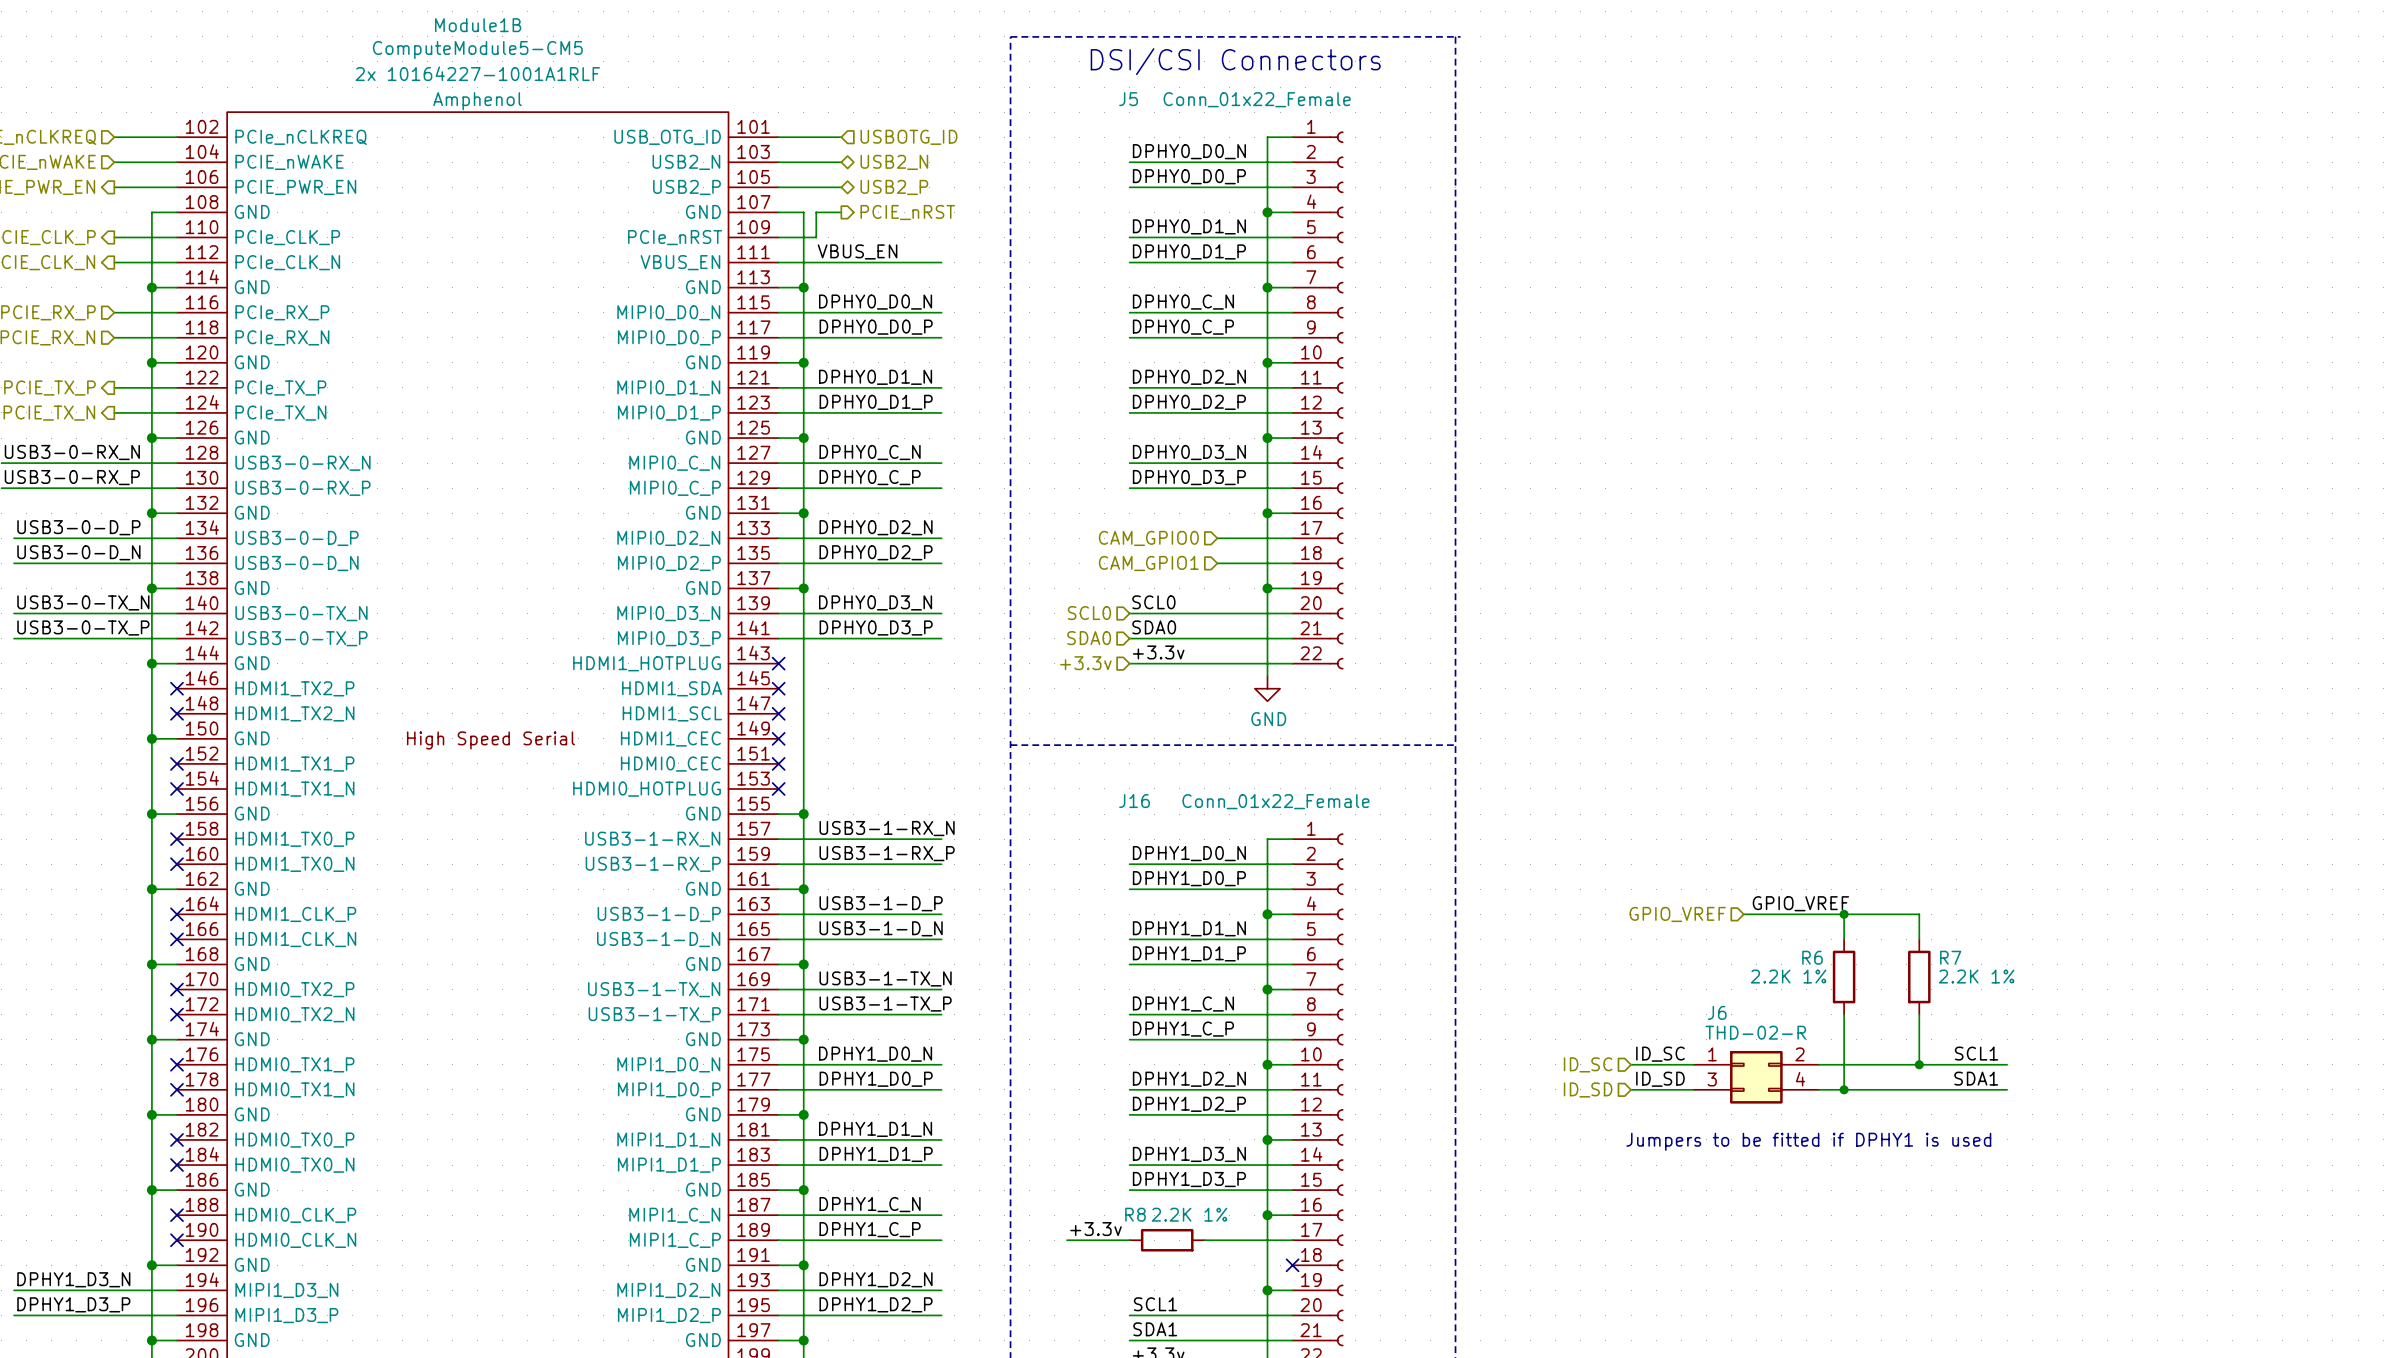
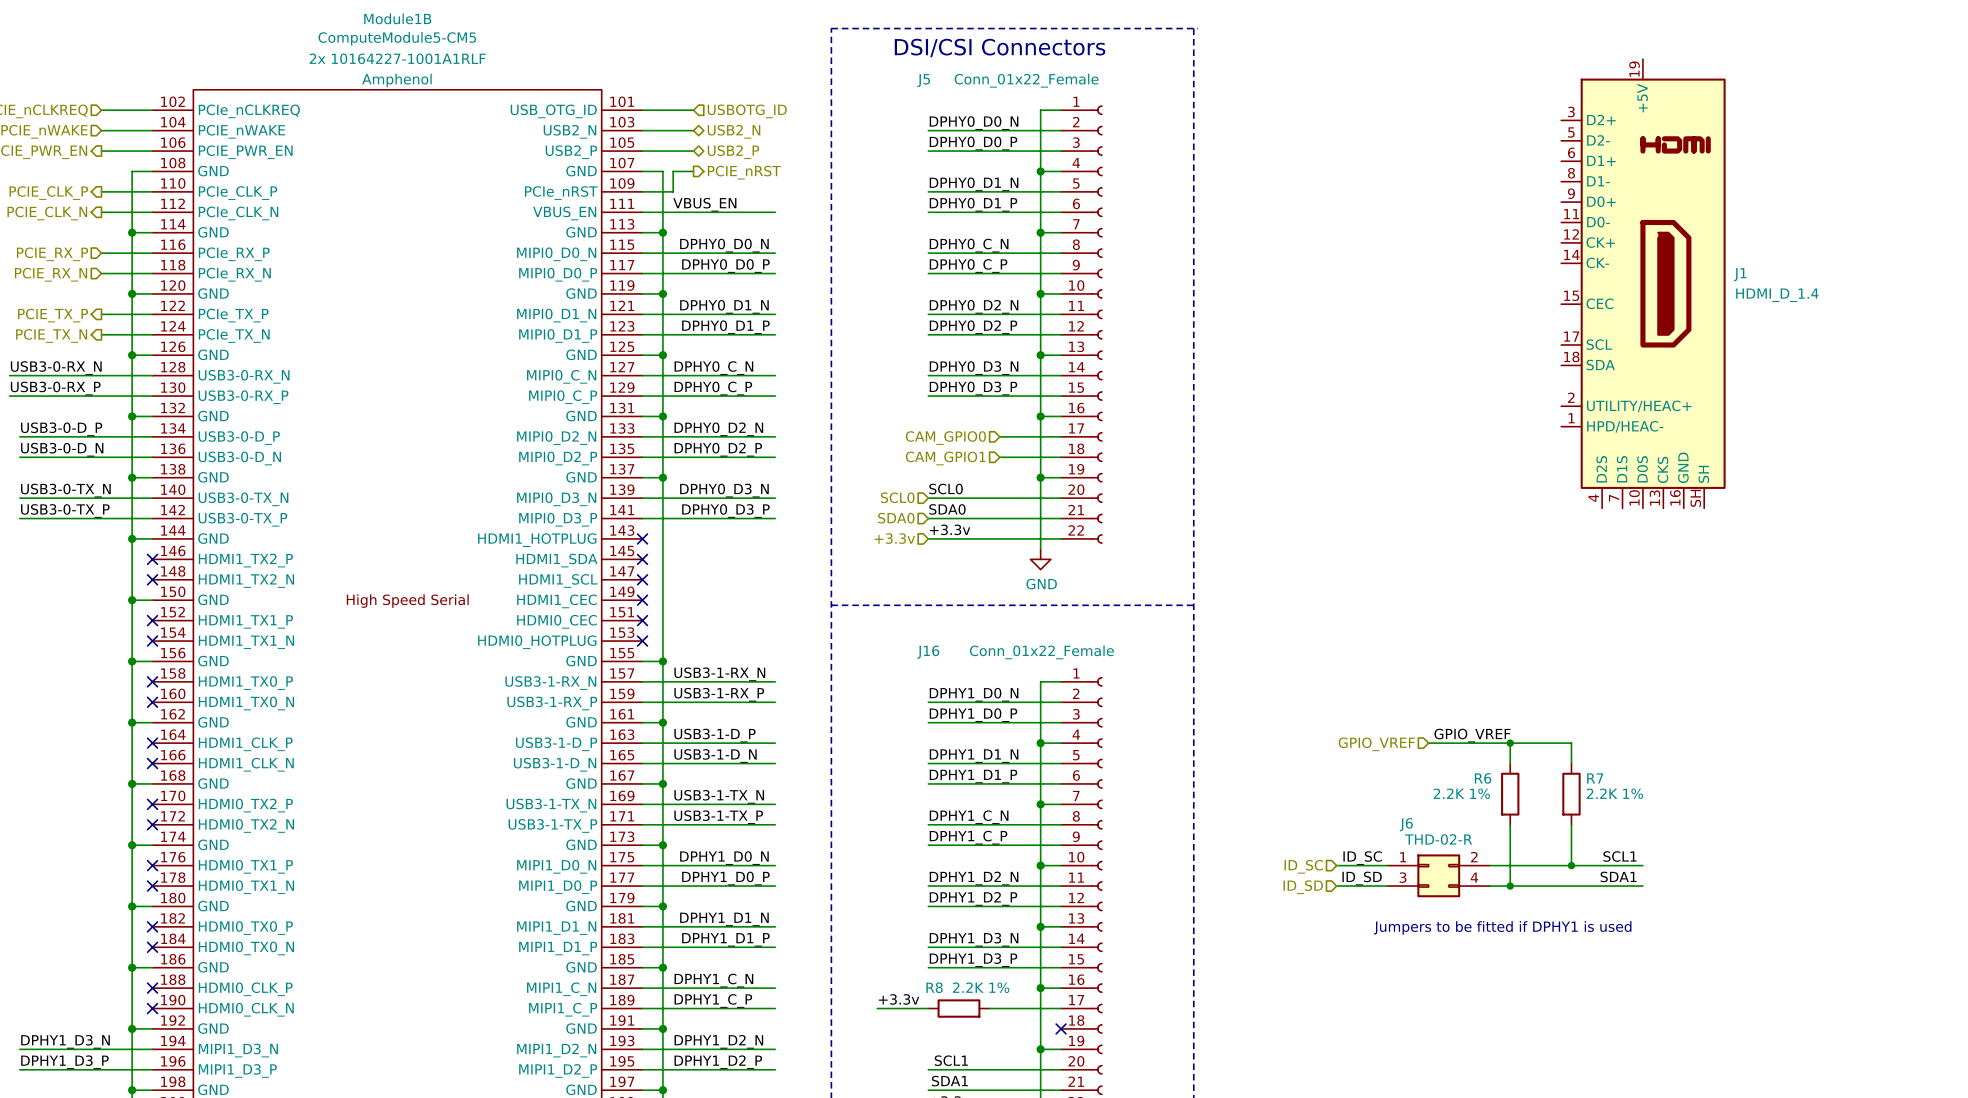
J1: none -> HDMI_D_1.4 (1643, 283)

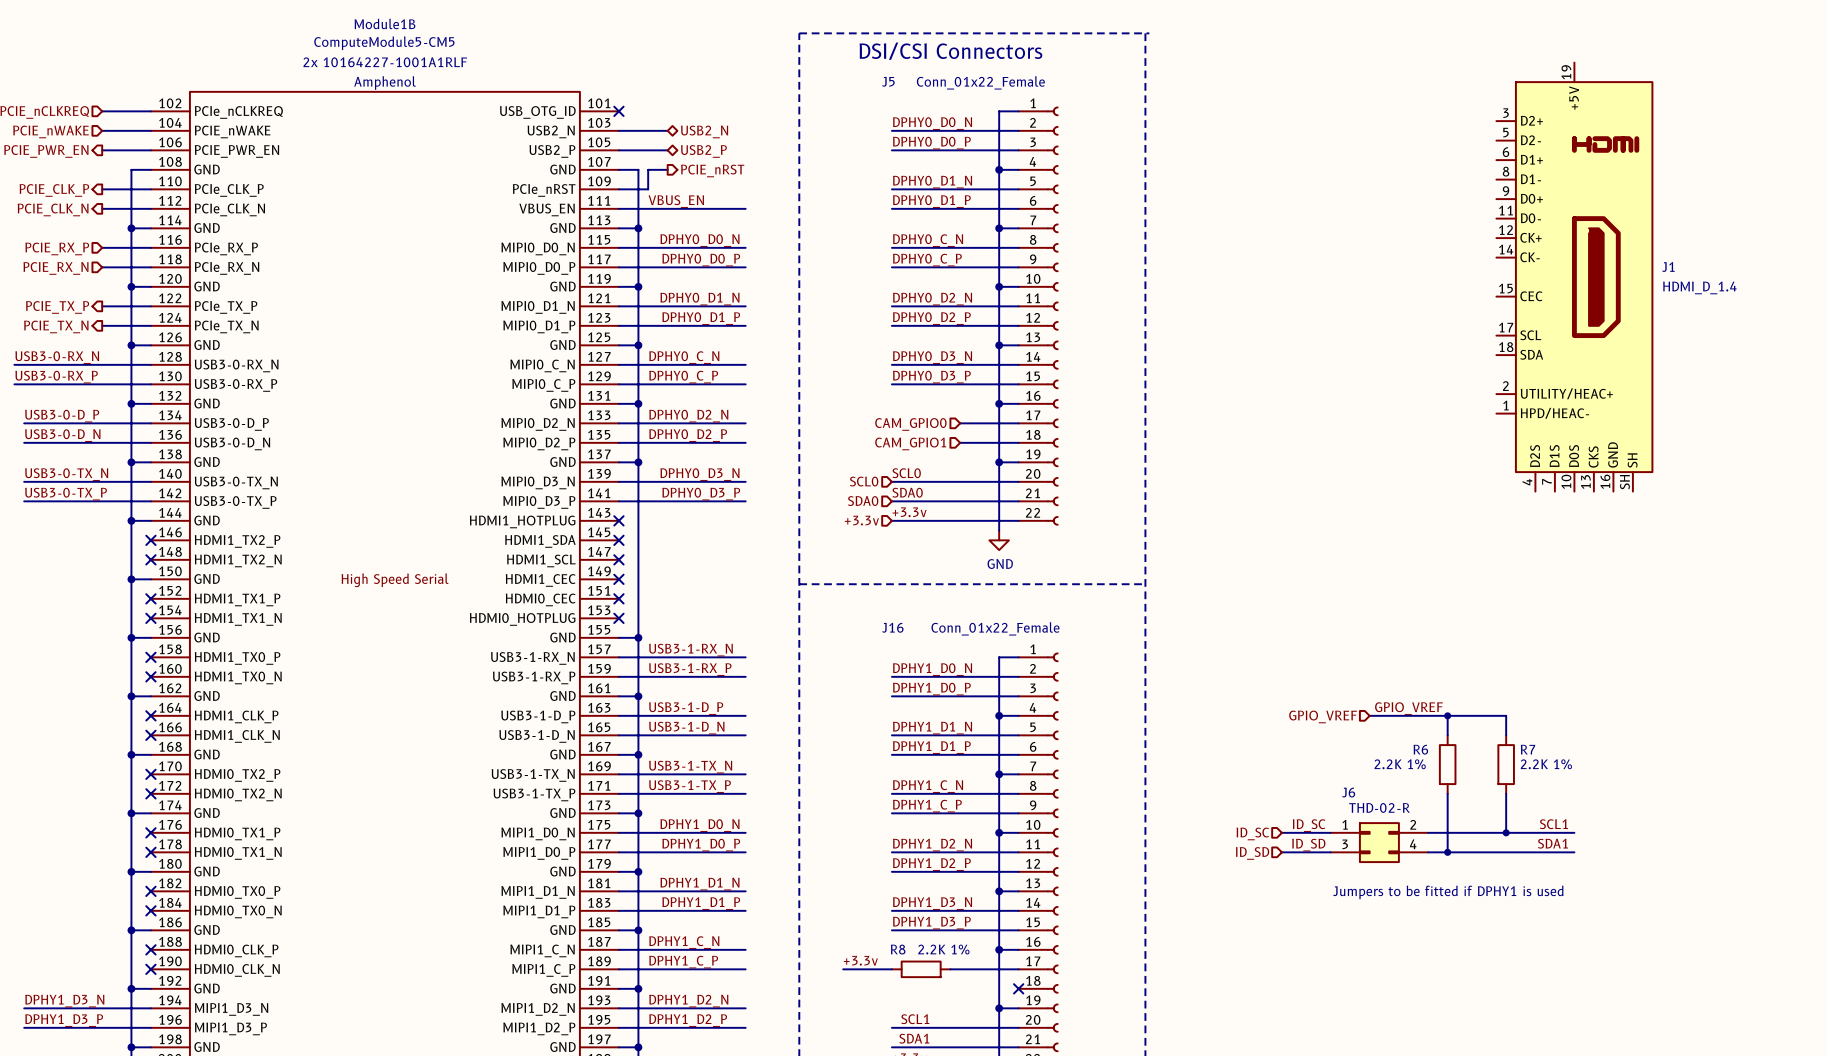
wire: (642, 110) (693, 110) -> none
no-connect mark: none -> (618, 111)
hierarchical label: USBOTG_ID (747, 111) -> none

